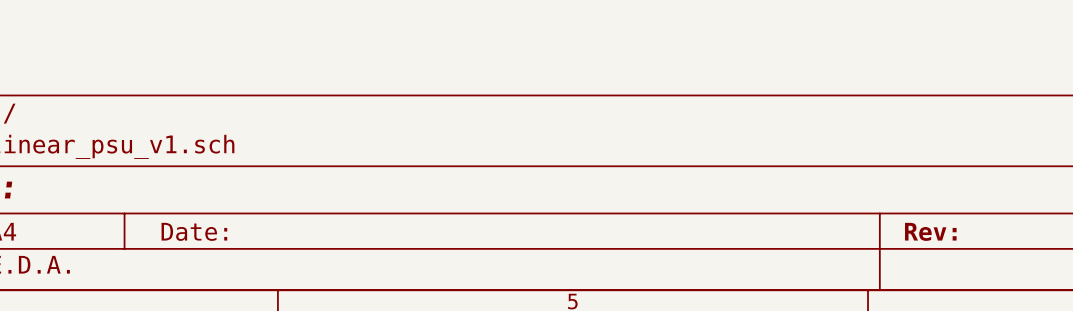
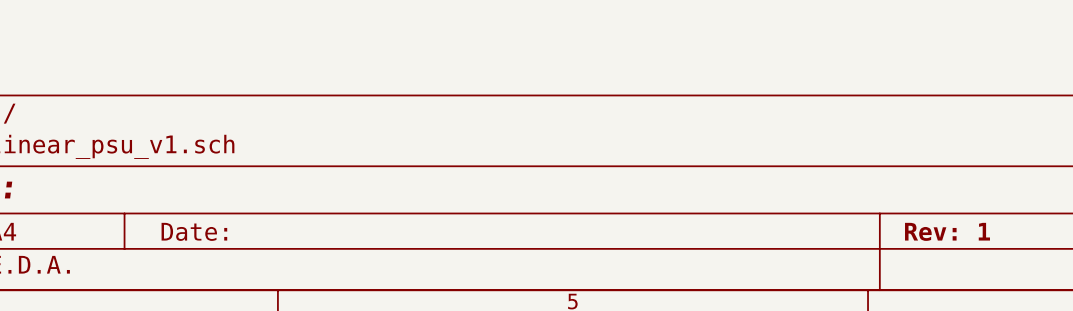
title block: Rev: (930, 231) -> Rev: 1 (947, 231)

